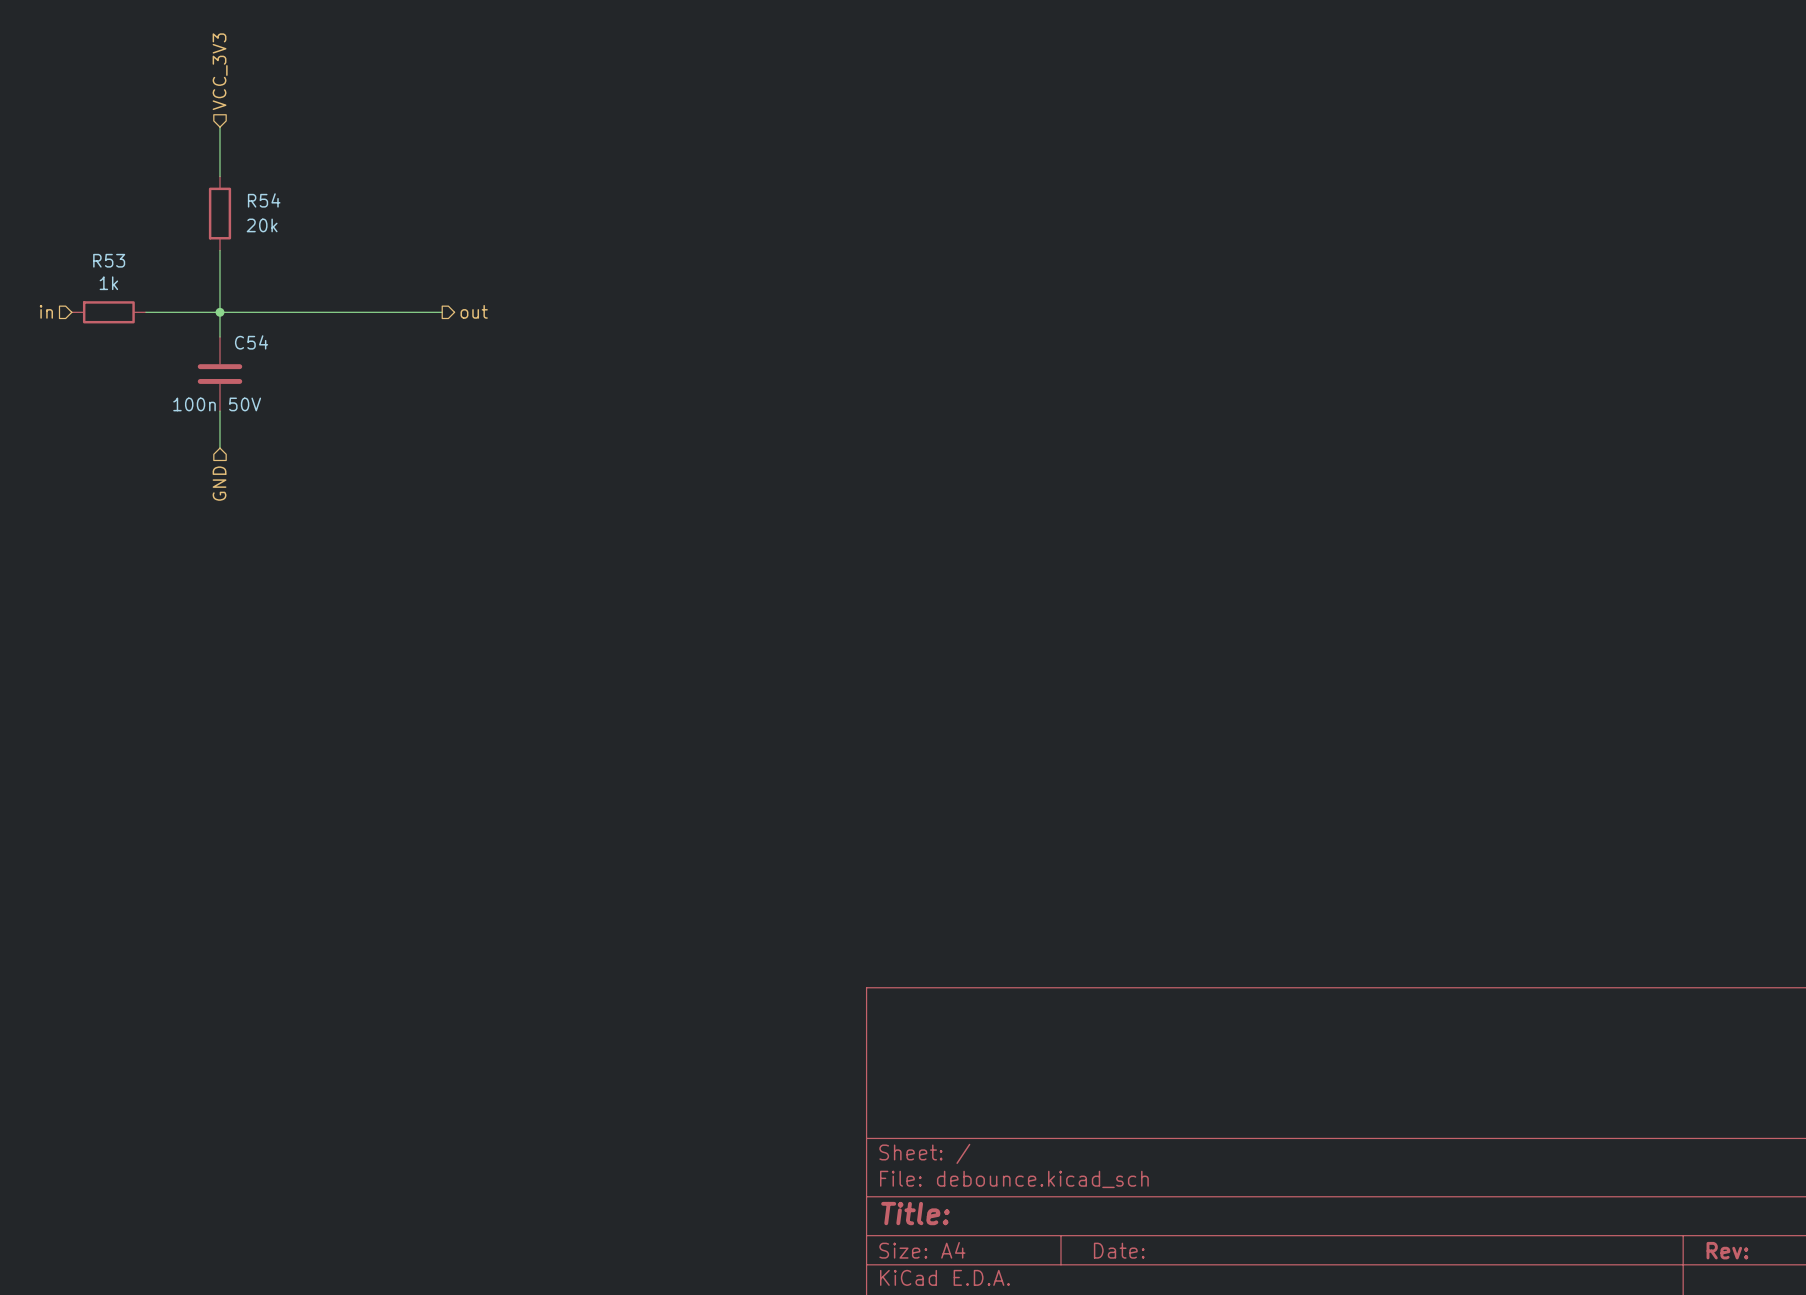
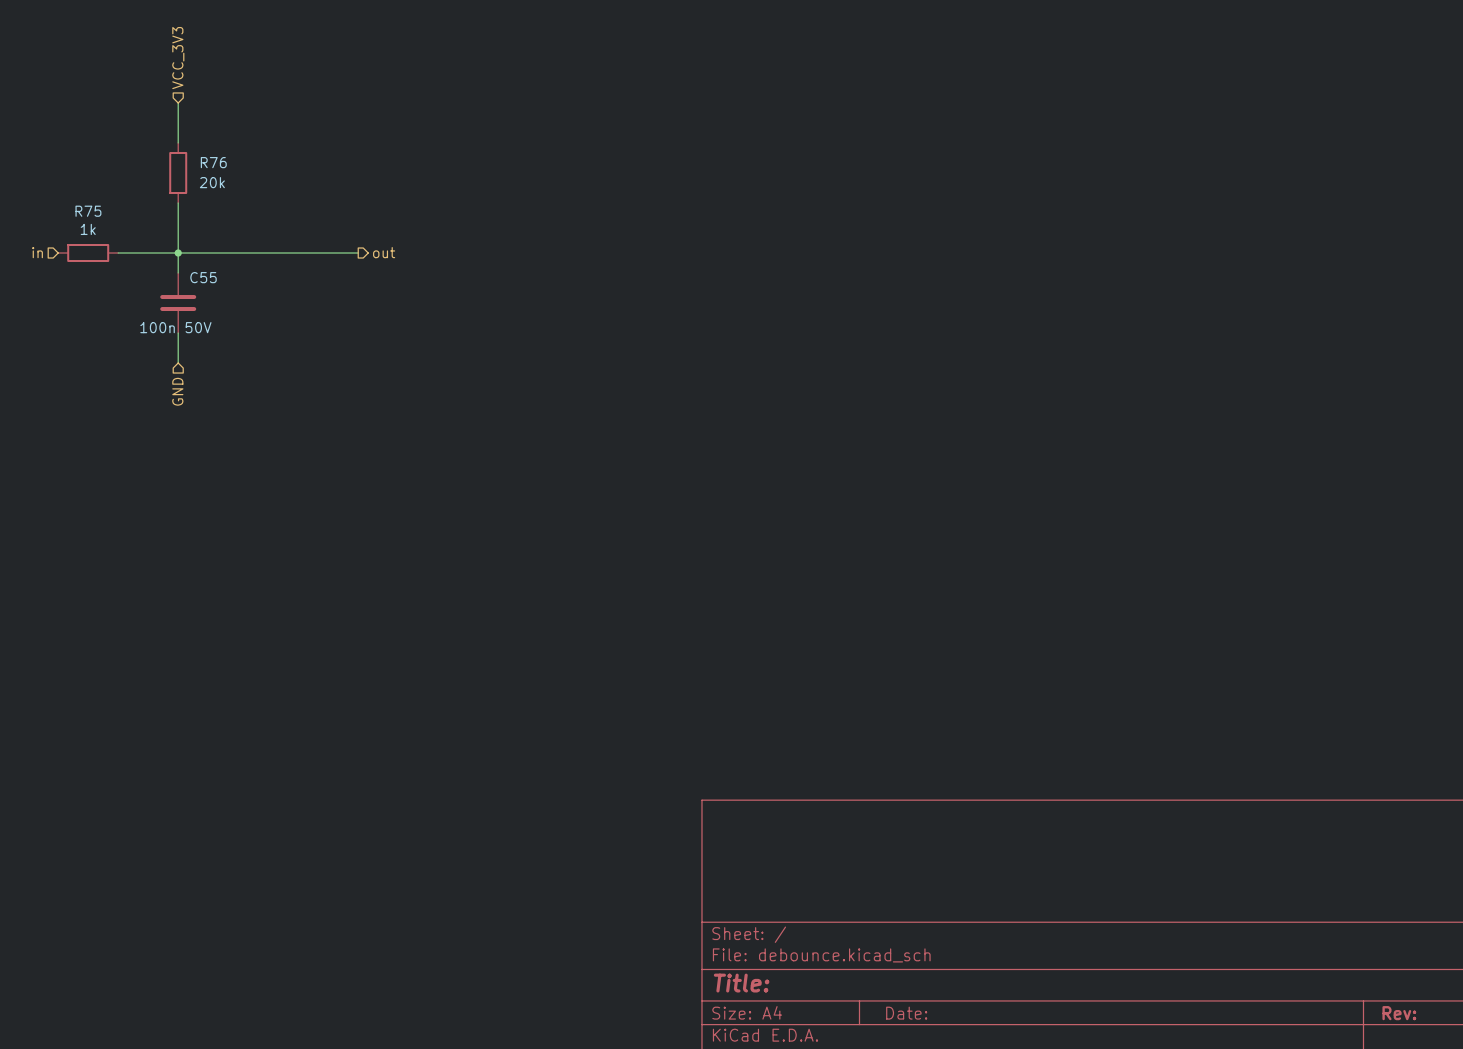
R54 name: R54 (264, 200) -> R76 (213, 162)
R53 name: R53 (109, 260) -> R75 (88, 211)
C54 name: C54 (251, 342) -> C55 (203, 277)

